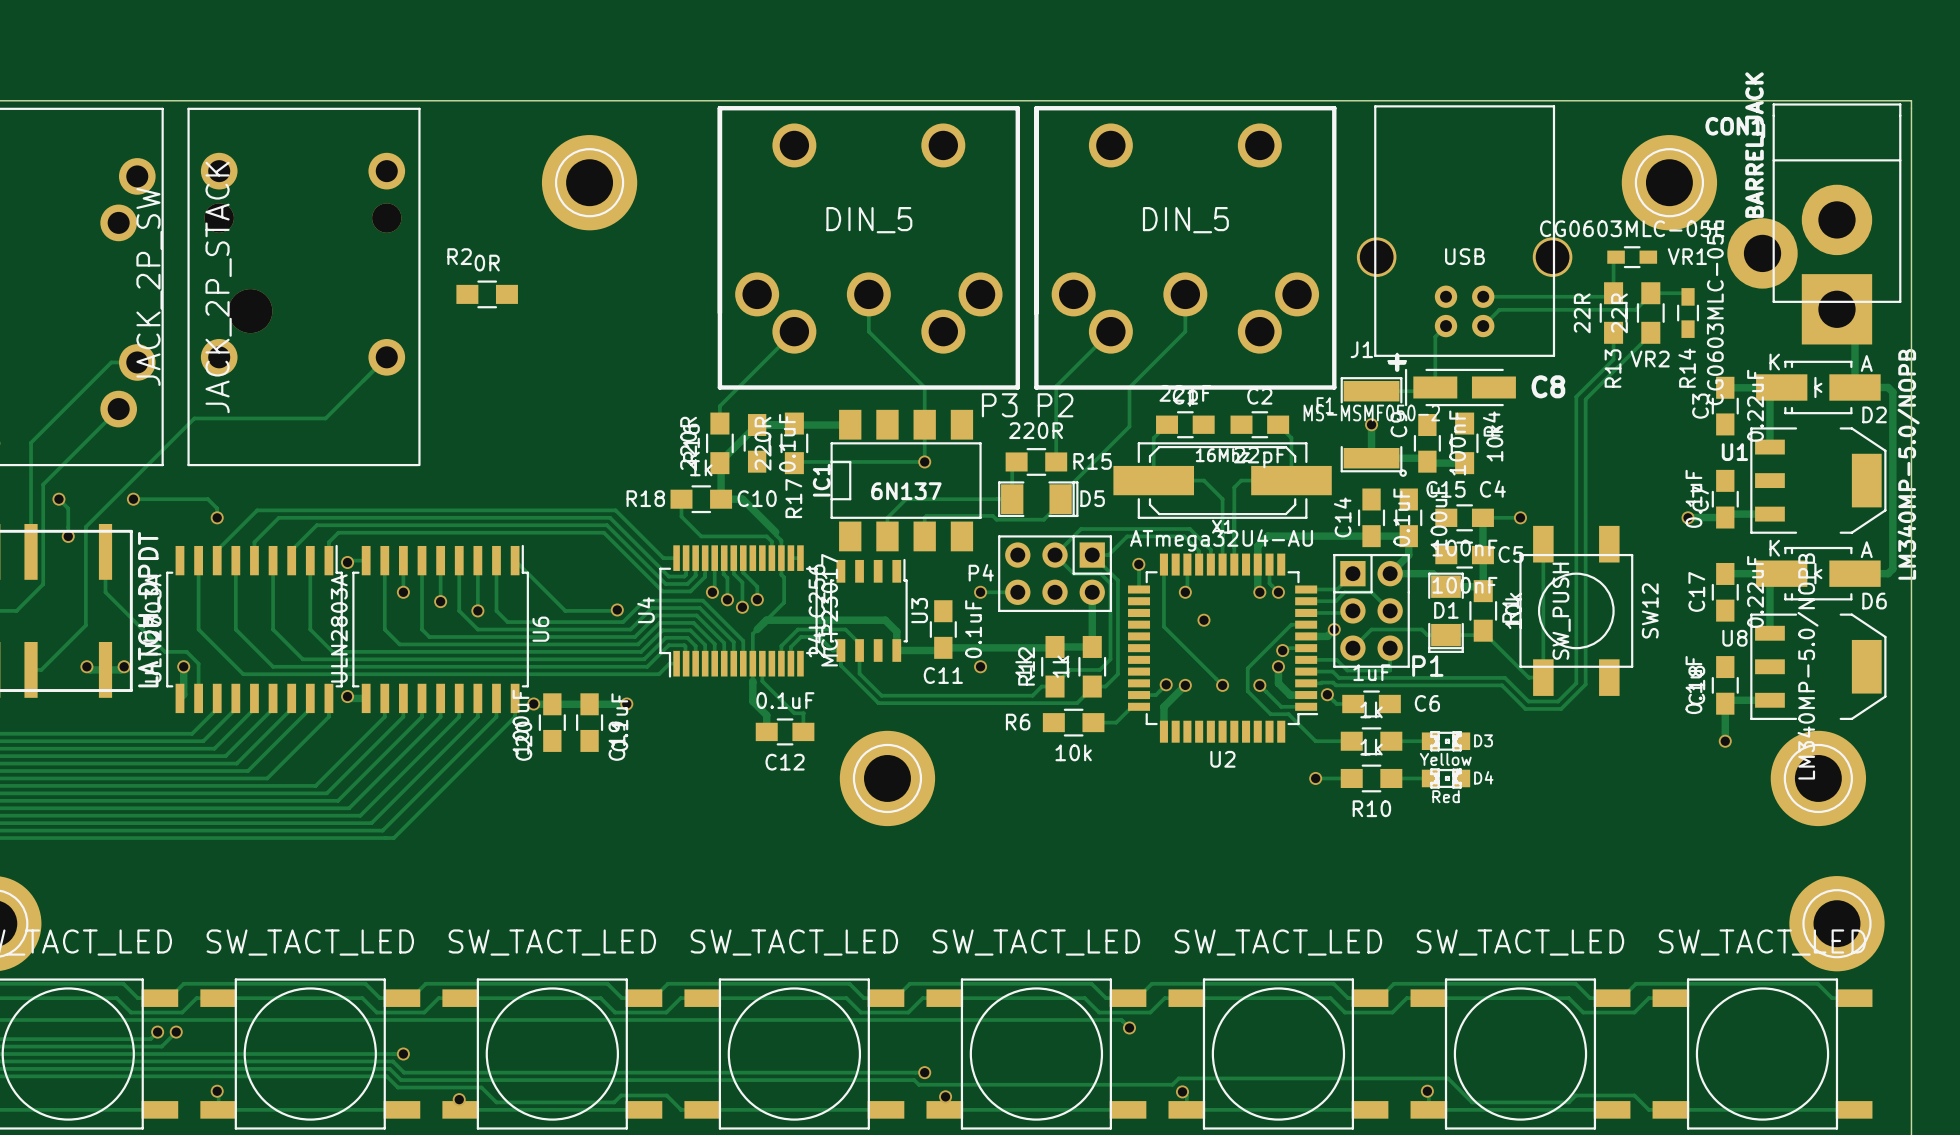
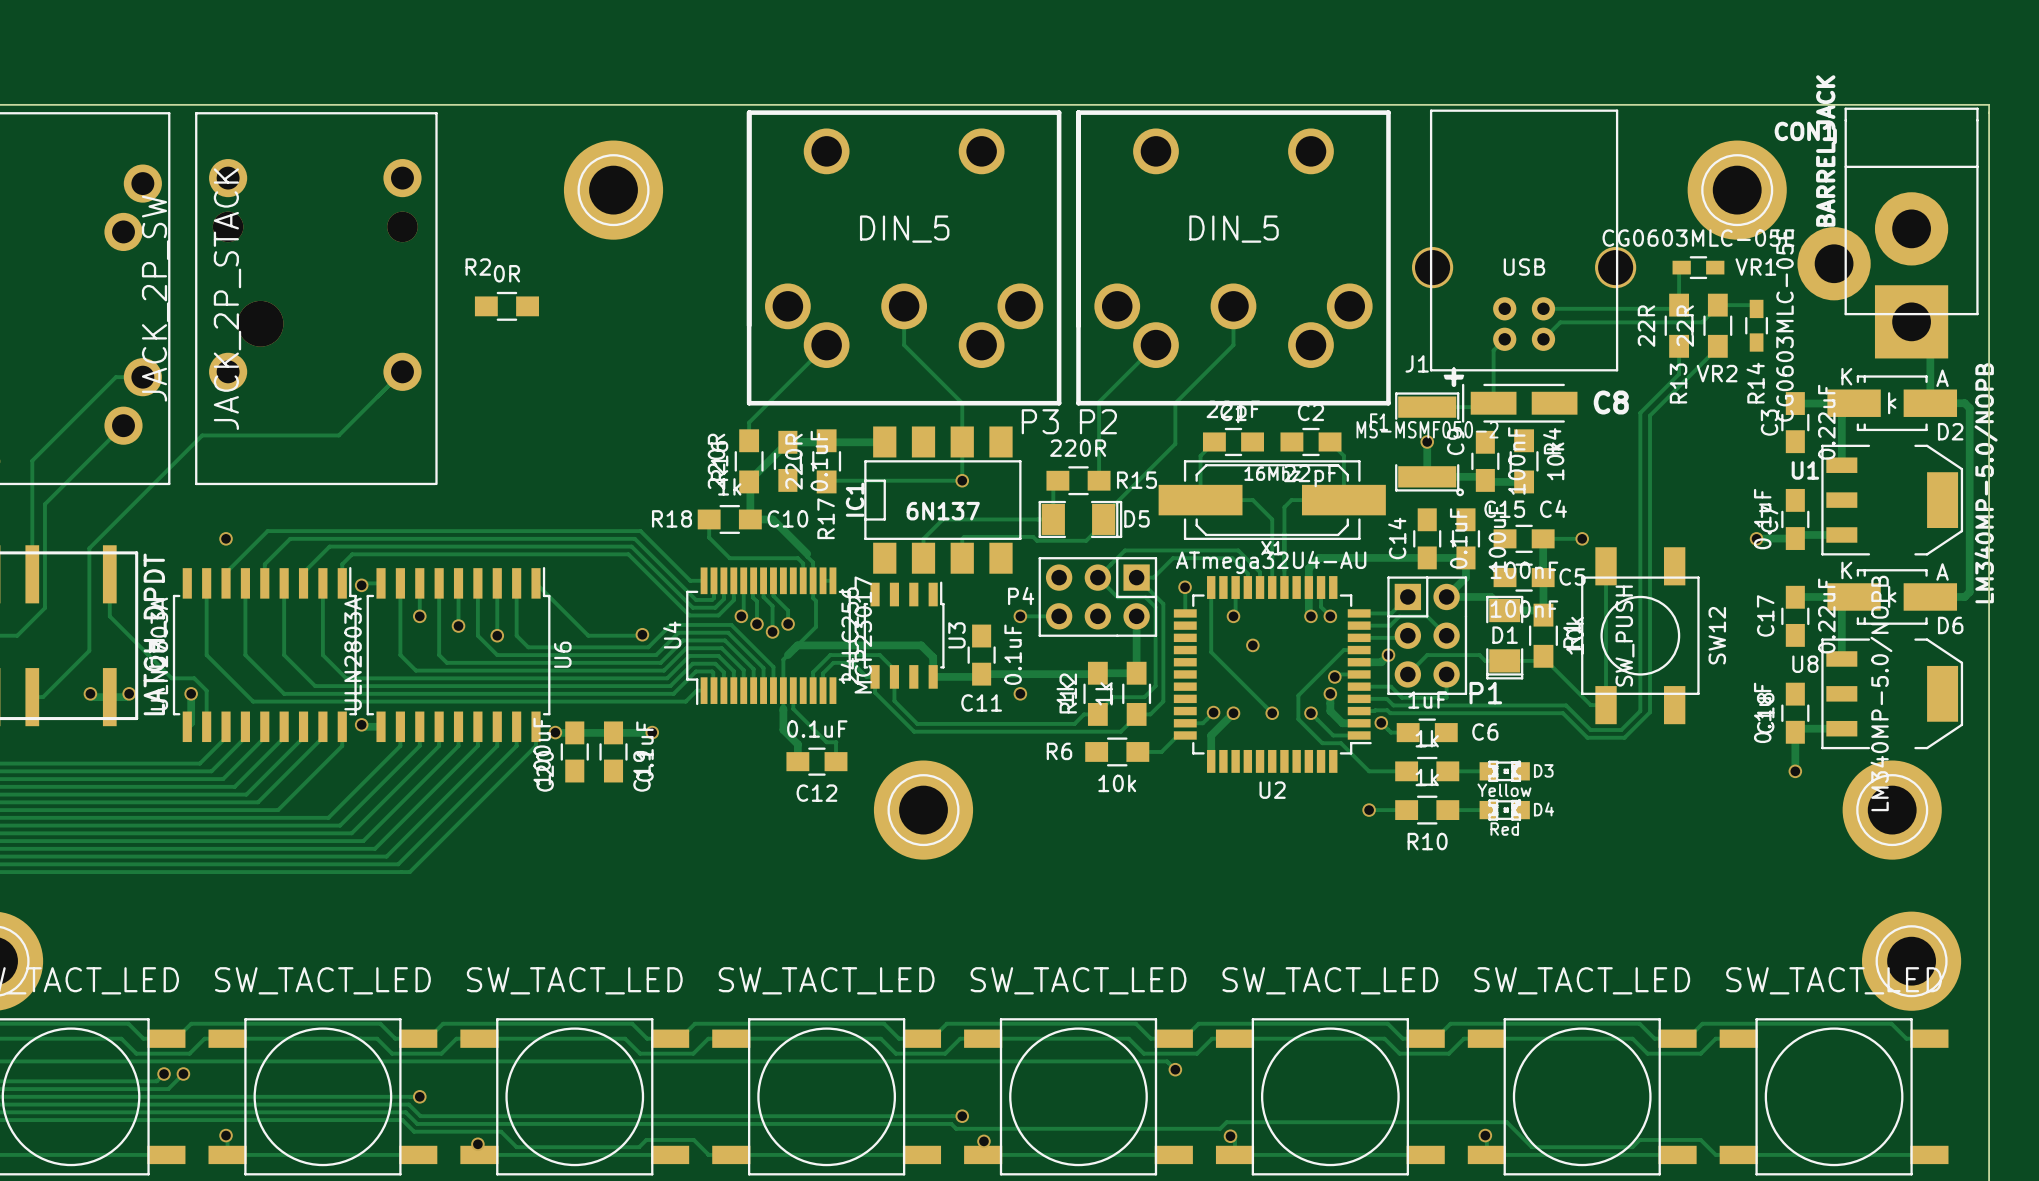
track: (58, 499) (68, 508) (68, 536) -> none
via: (58, 499) -> none
track: (133, 499) (207, 499) (217, 508) (217, 517) -> none
via: (133, 499) -> none
via: (68, 536) -> none

